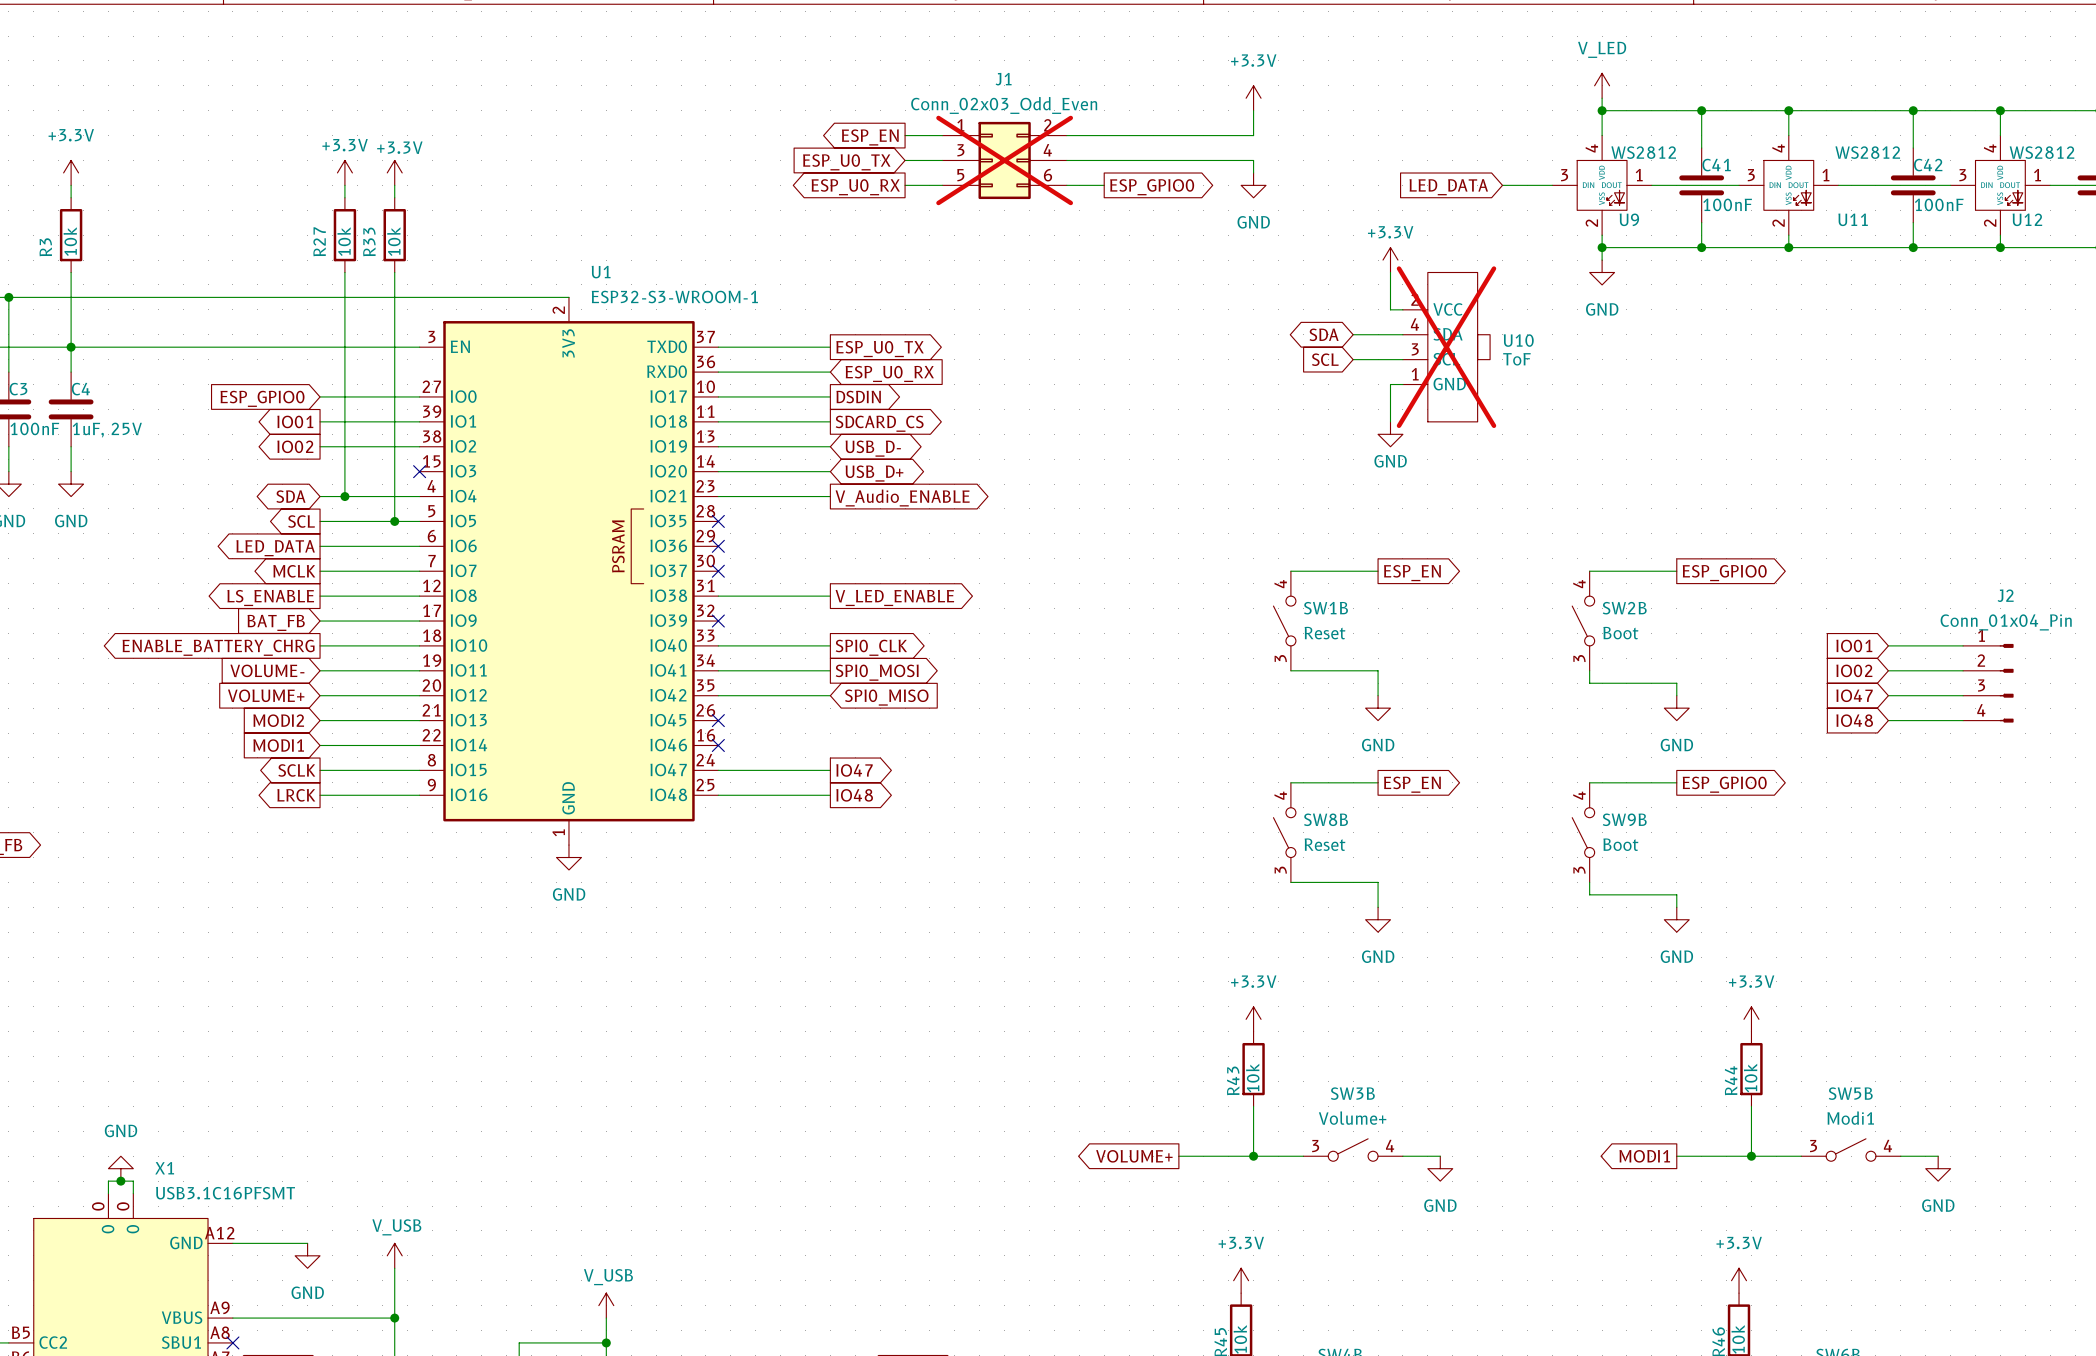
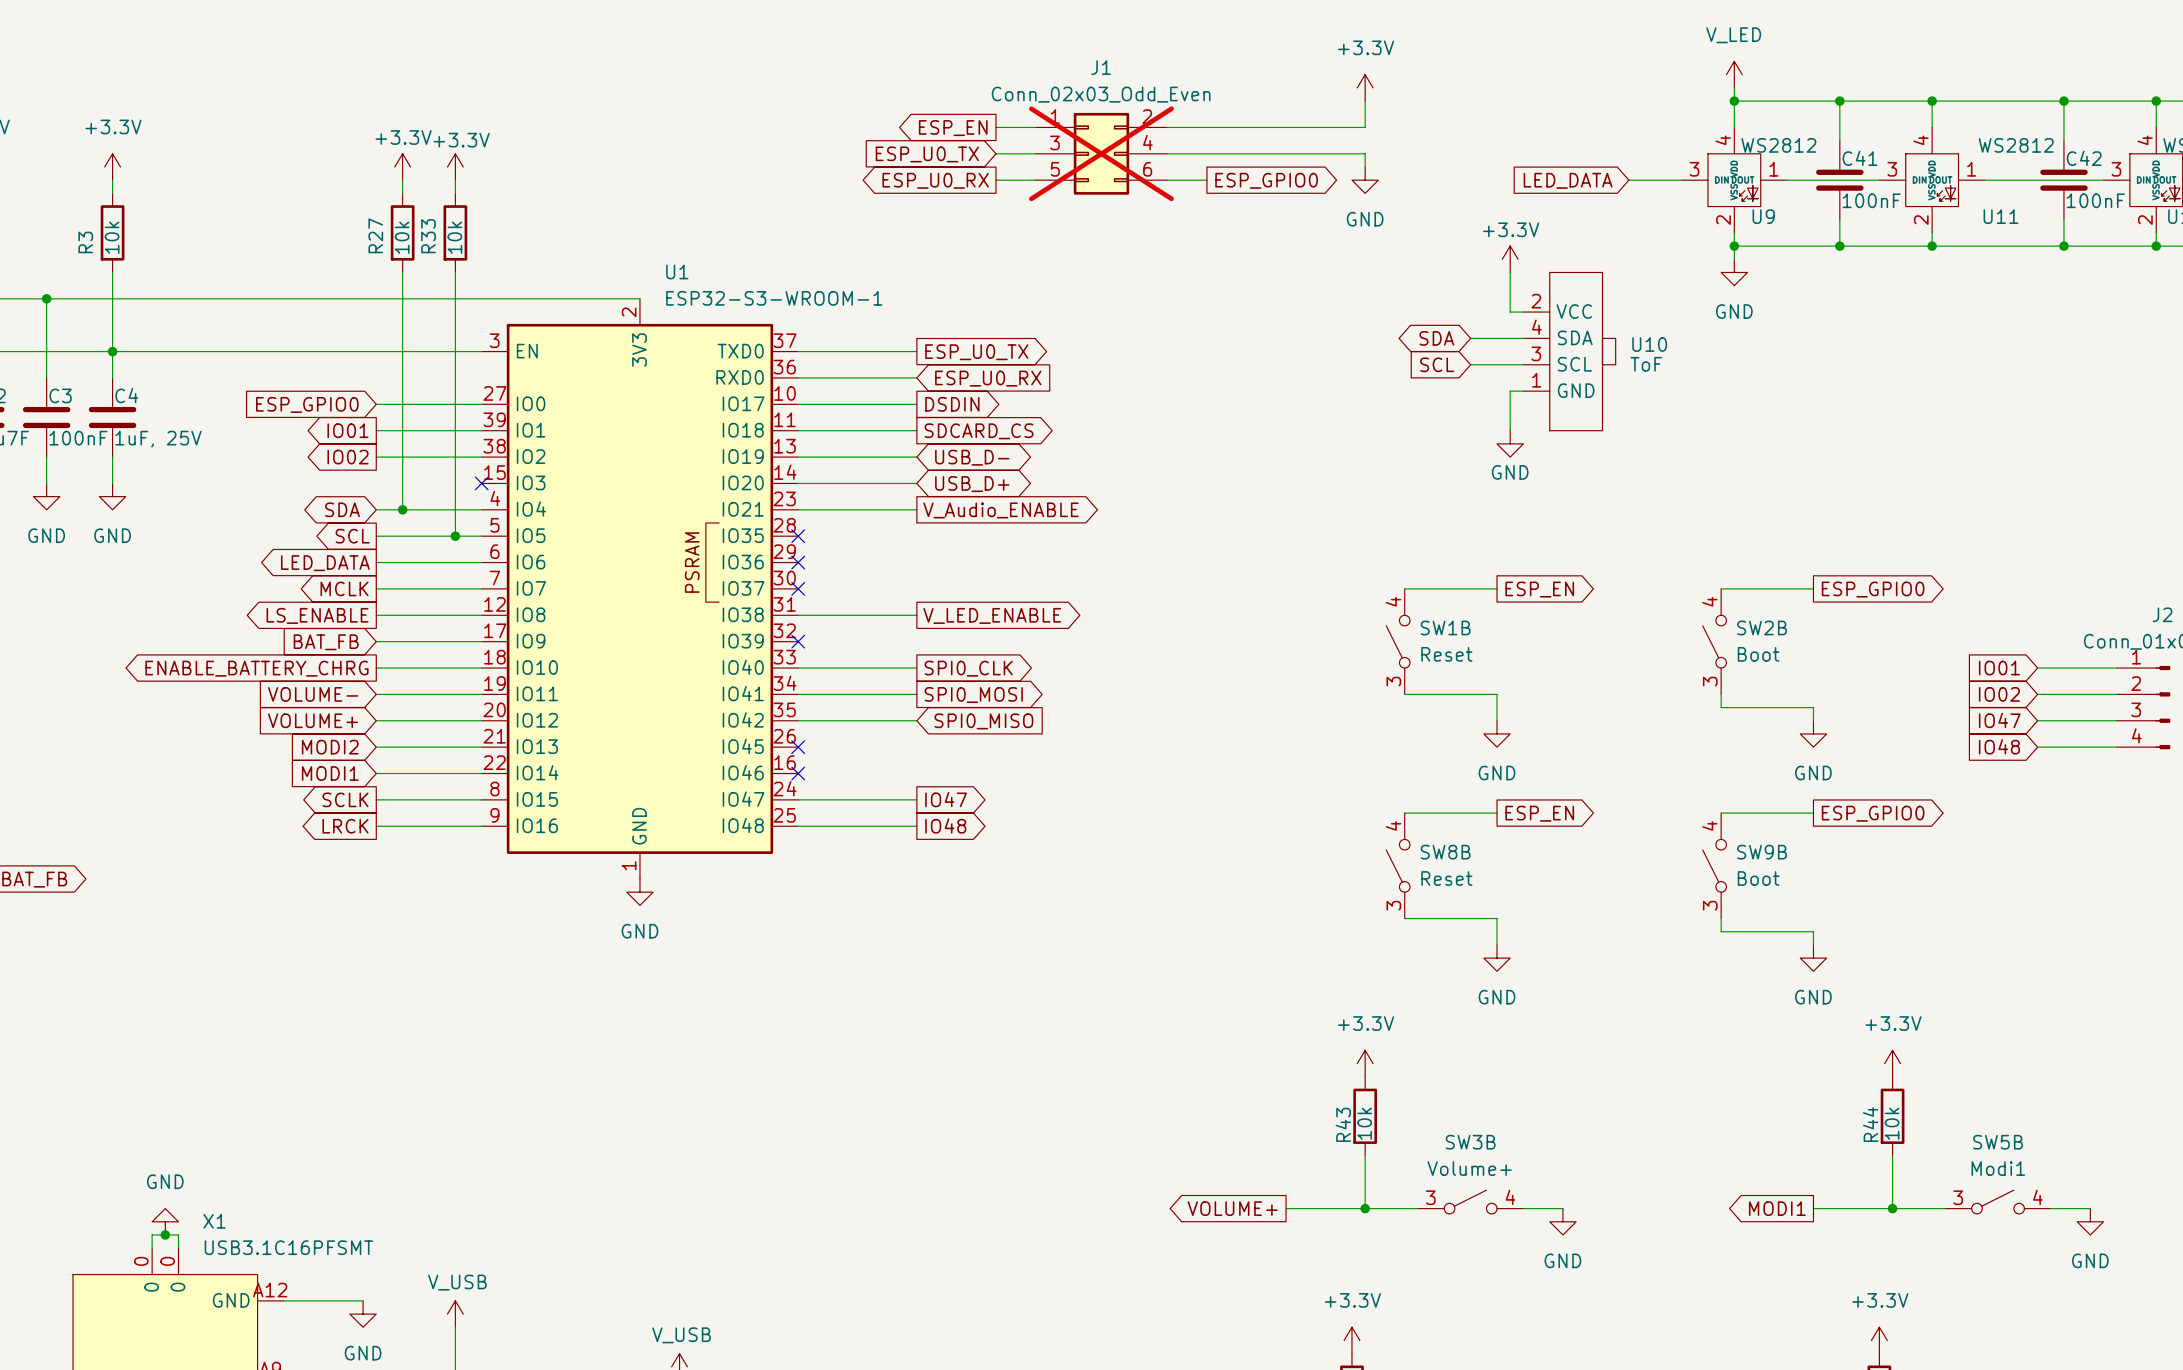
U10 do-not-place cross: (1446, 347) -> none

